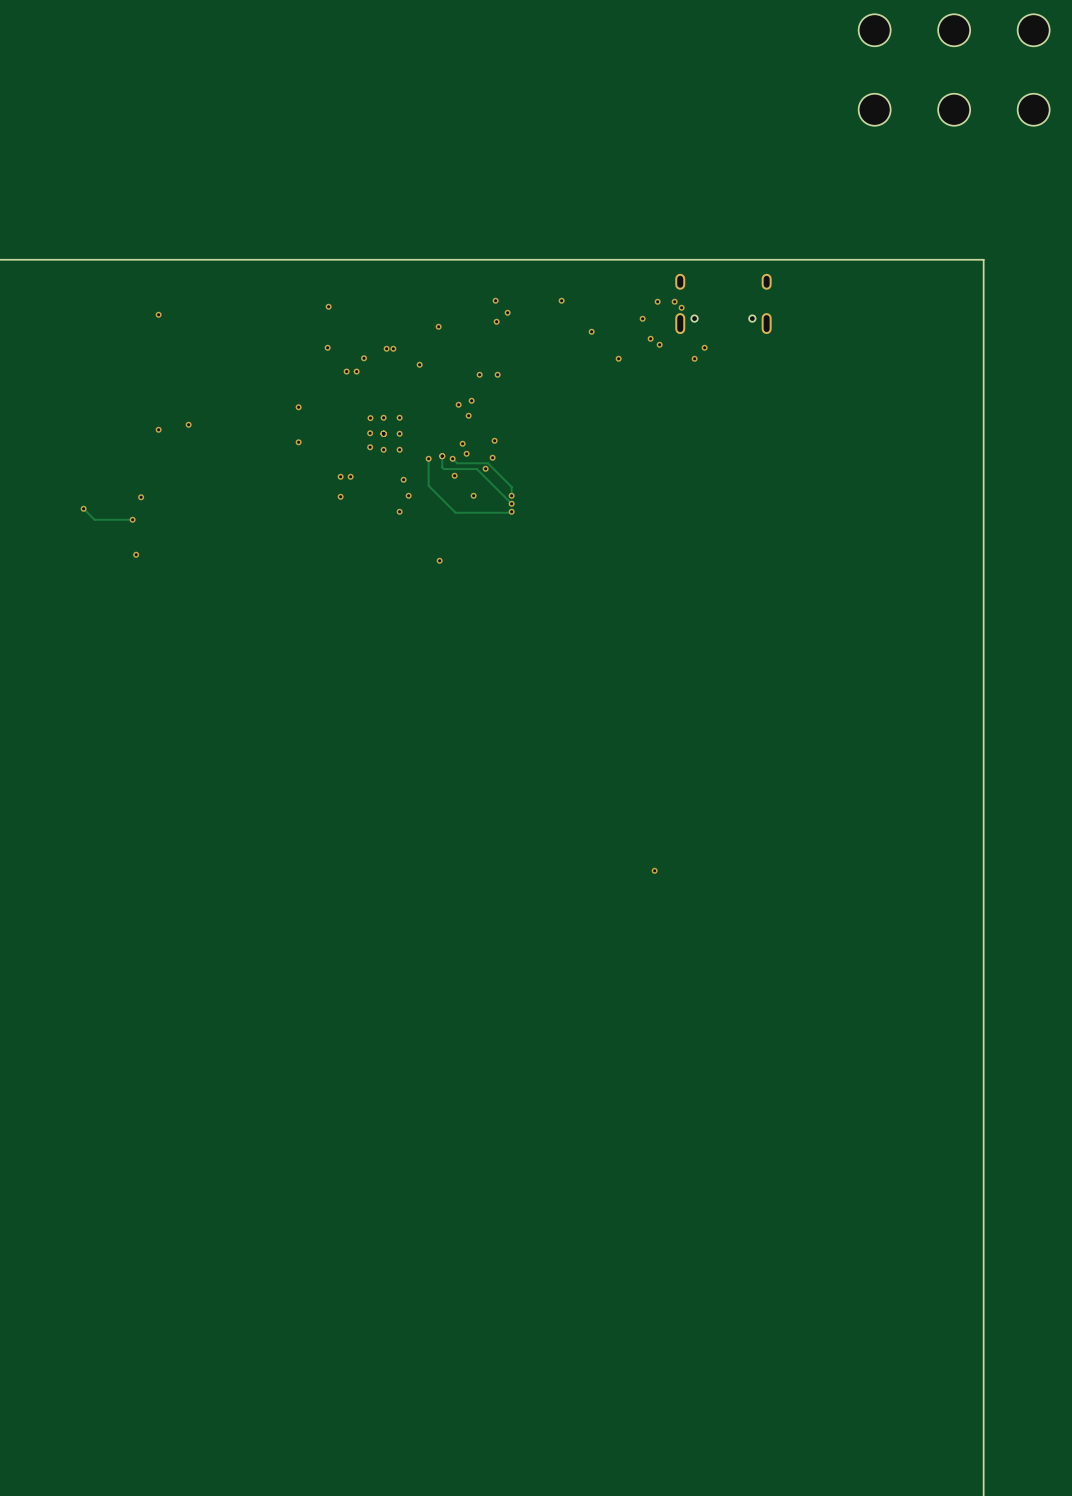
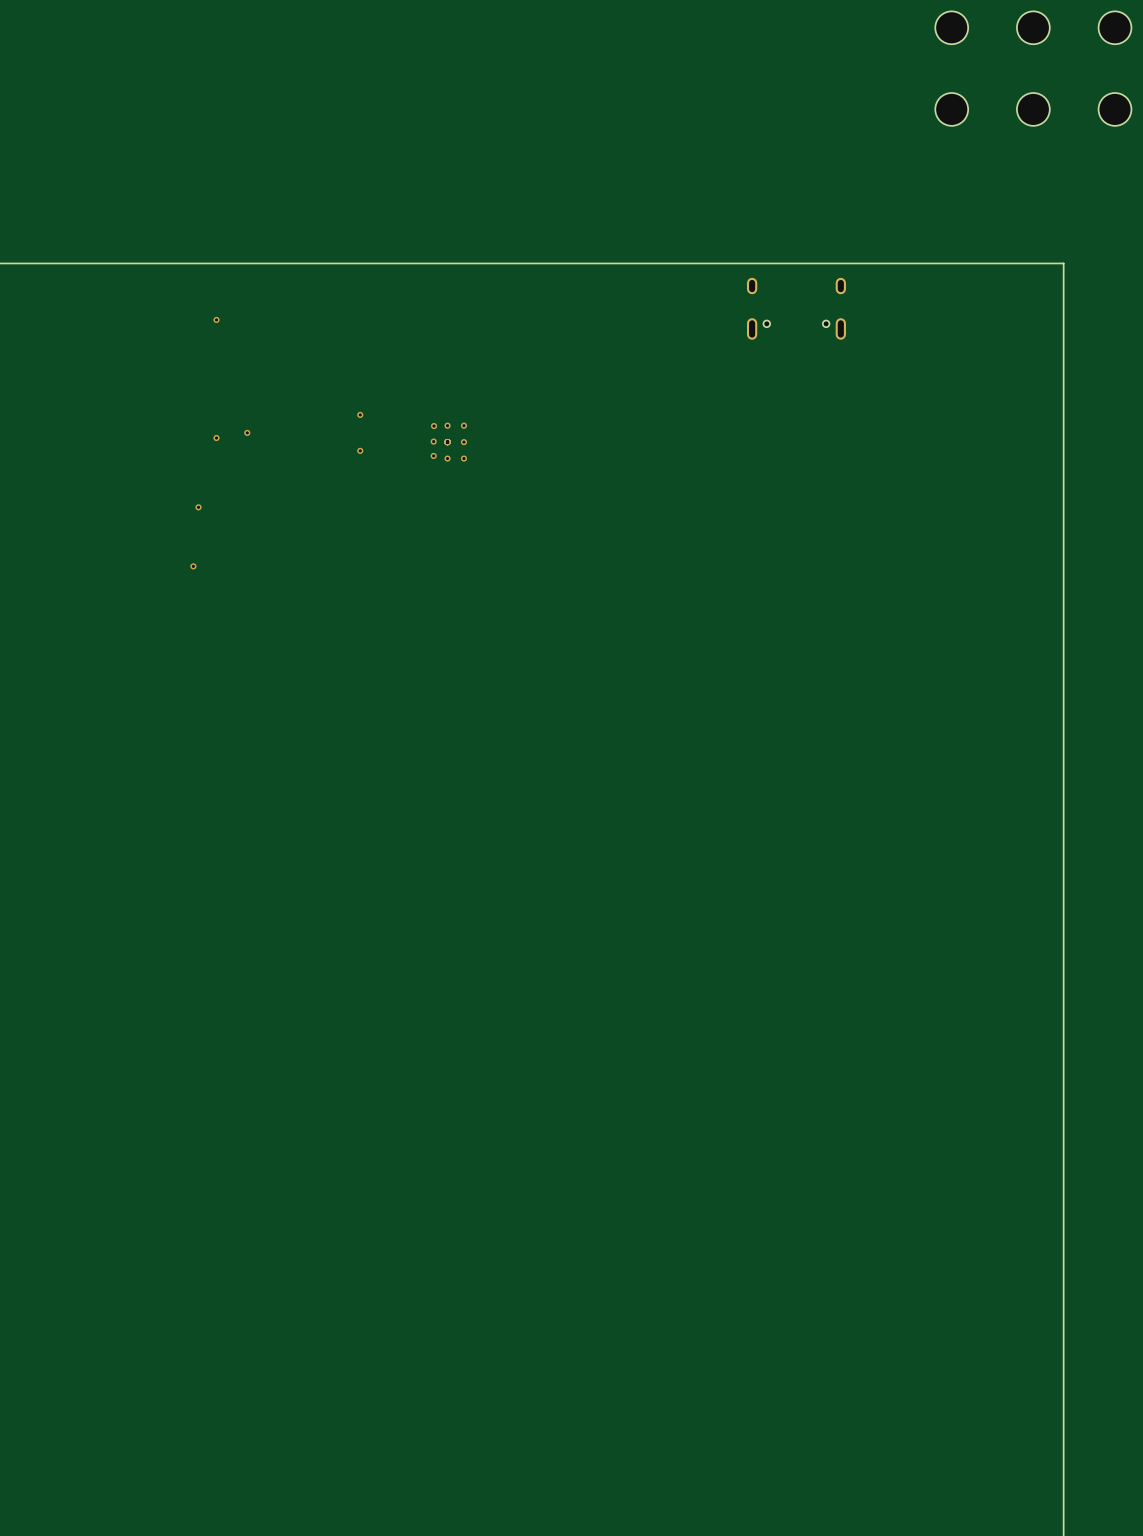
via: (495, 300) -> none
via: (561, 300) -> none
via: (657, 301) -> none
via: (674, 301) -> none
via: (328, 306) -> none
via: (681, 307) -> none
via: (507, 312) -> none
via: (642, 318) -> none
via: (496, 321) -> none
via: (438, 326) -> none
via: (591, 331) -> none
via: (650, 338) -> none
via: (659, 344) -> none
via: (327, 347) -> none
via: (704, 347) -> none
via: (386, 348) -> none
via: (393, 348) -> none
via: (364, 358) -> none
via: (618, 358) -> none
via: (694, 358) -> none
via: (419, 364) -> none
via: (346, 371) -> none
via: (356, 371) -> none
via: (479, 374) -> none
via: (497, 374) -> none
via: (471, 400) -> none
via: (458, 404) -> none
via: (468, 415) -> none
via: (494, 440) -> none
via: (462, 443) -> none
via: (466, 453) -> none
track: (442, 456) (443, 469) (476, 469) (511, 503) -> none
via: (442, 456) -> none
via: (492, 457) -> none
track: (428, 458) (428, 485) (455, 512) (511, 511) -> none
via: (428, 458) -> none
track: (452, 458) (457, 463) (487, 463) (511, 486) (511, 495) -> none
via: (452, 458) -> none
via: (485, 468) -> none
via: (454, 475) -> none
via: (340, 476) -> none
via: (350, 476) -> none
via: (403, 479) -> none
via: (408, 495) -> none
via: (473, 495) -> none
via: (511, 495) -> none
via: (340, 496) -> none
via: (511, 503) -> none
track: (83, 508) (94, 519) (132, 519) -> none
via: (83, 508) -> none
via: (399, 511) -> none
via: (511, 511) -> none
via: (132, 519) -> none
via: (439, 560) -> none
via: (654, 870) -> none

